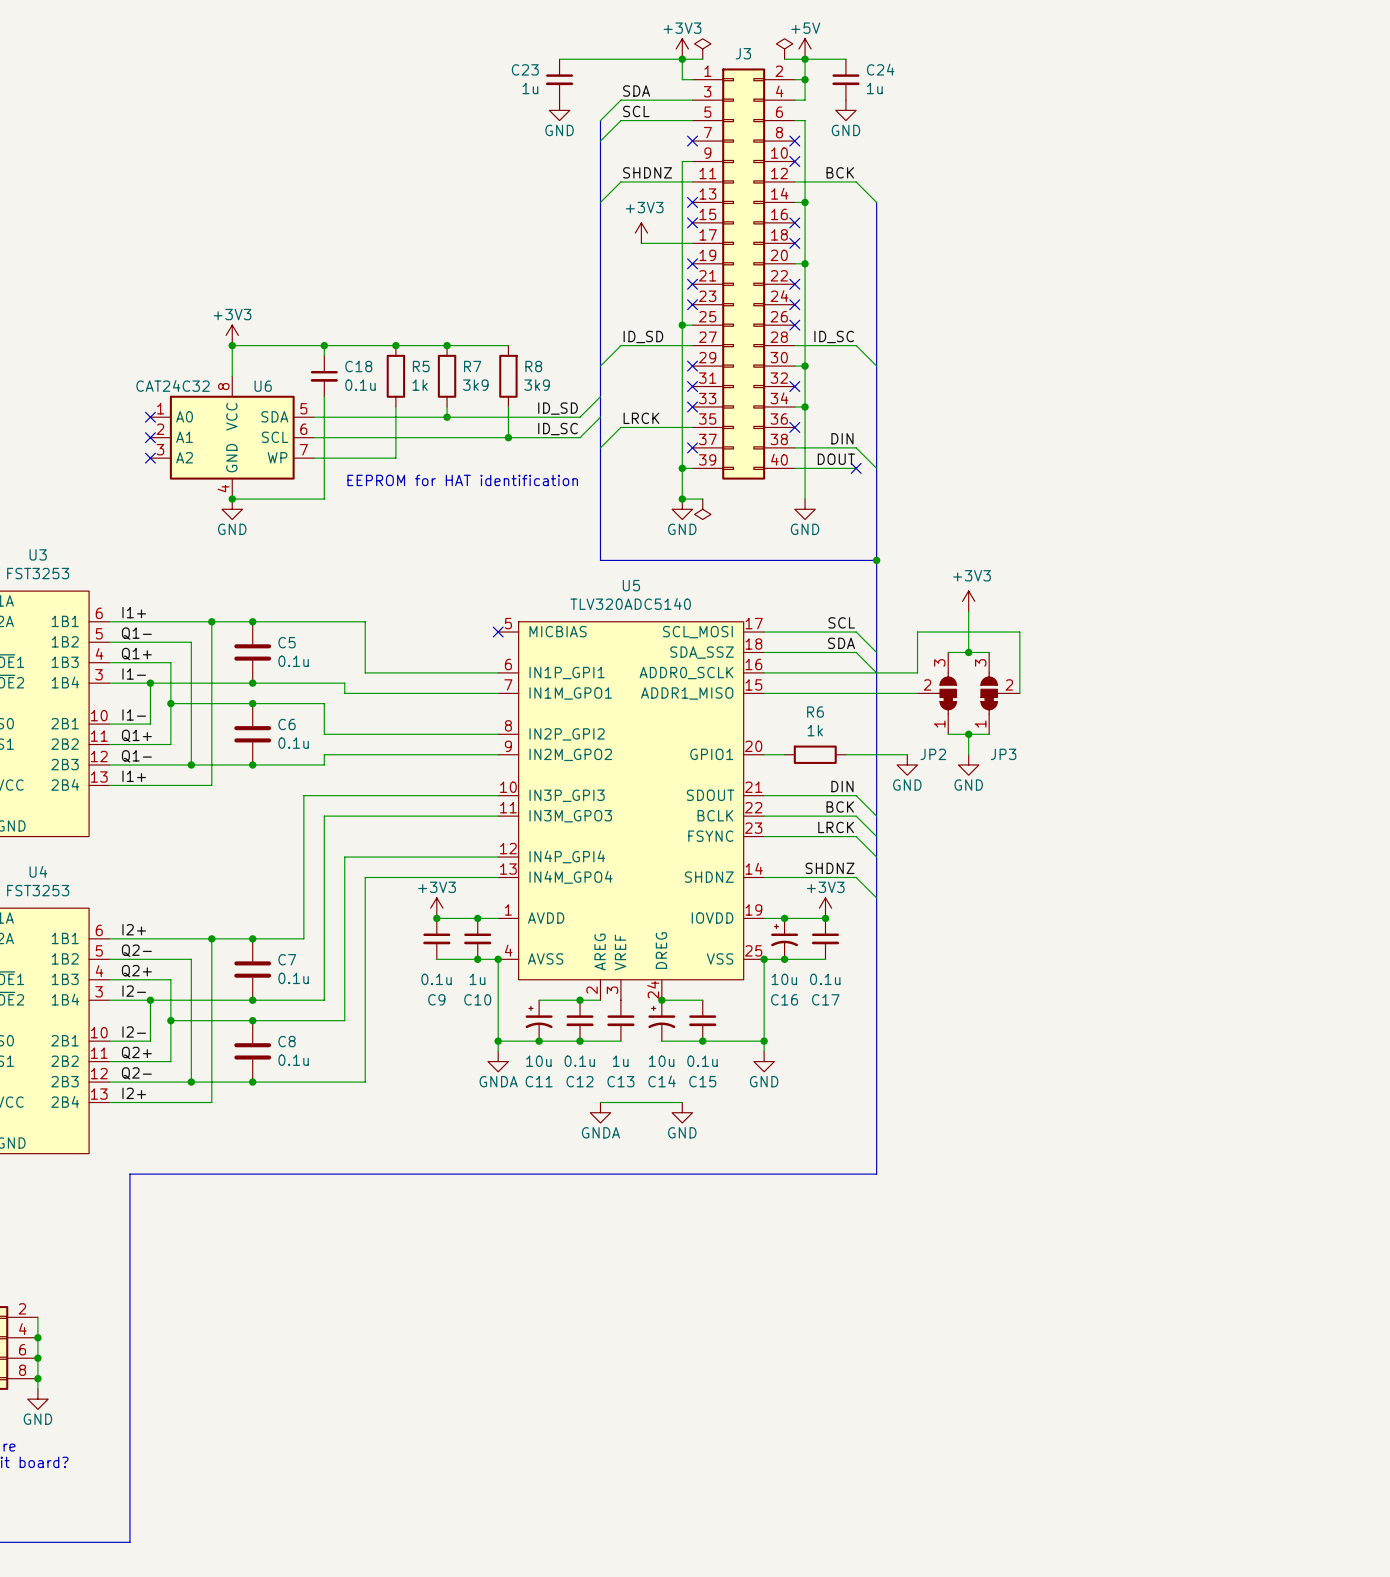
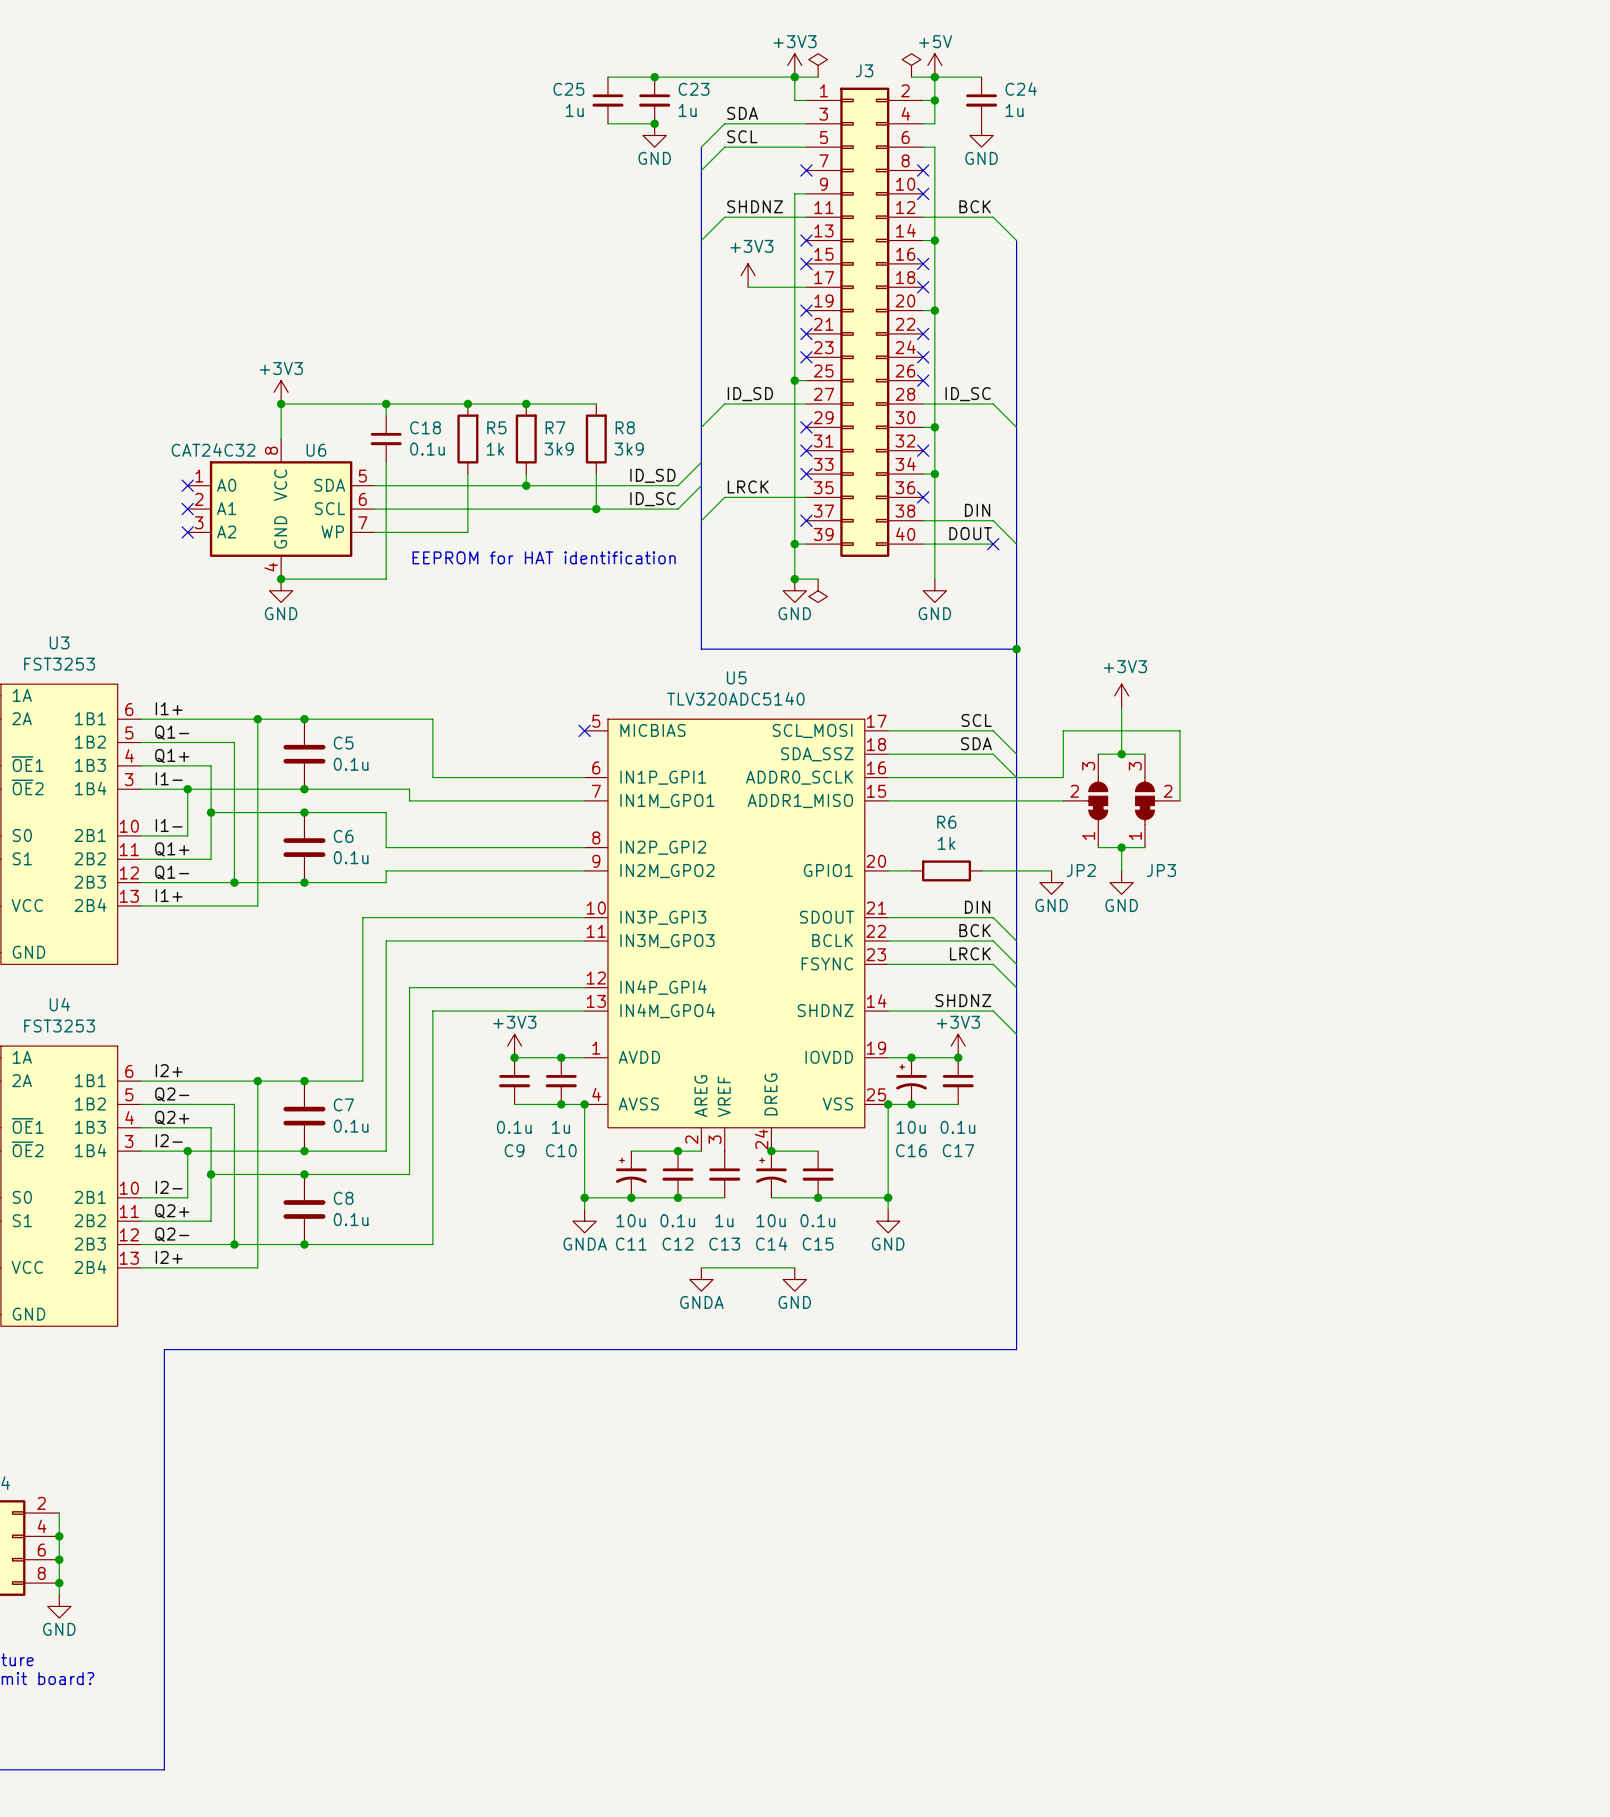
wire: none -> (607, 77) (654, 77)
junction: none -> (654, 77)
C23 name position: C23 (525, 69) -> C23 (694, 89)
C25: none -> 1u (607, 100)
C23 value position: 1u (530, 88) -> 1u (687, 110)
wire: none -> (607, 123) (654, 123)
junction: none -> (654, 123)

